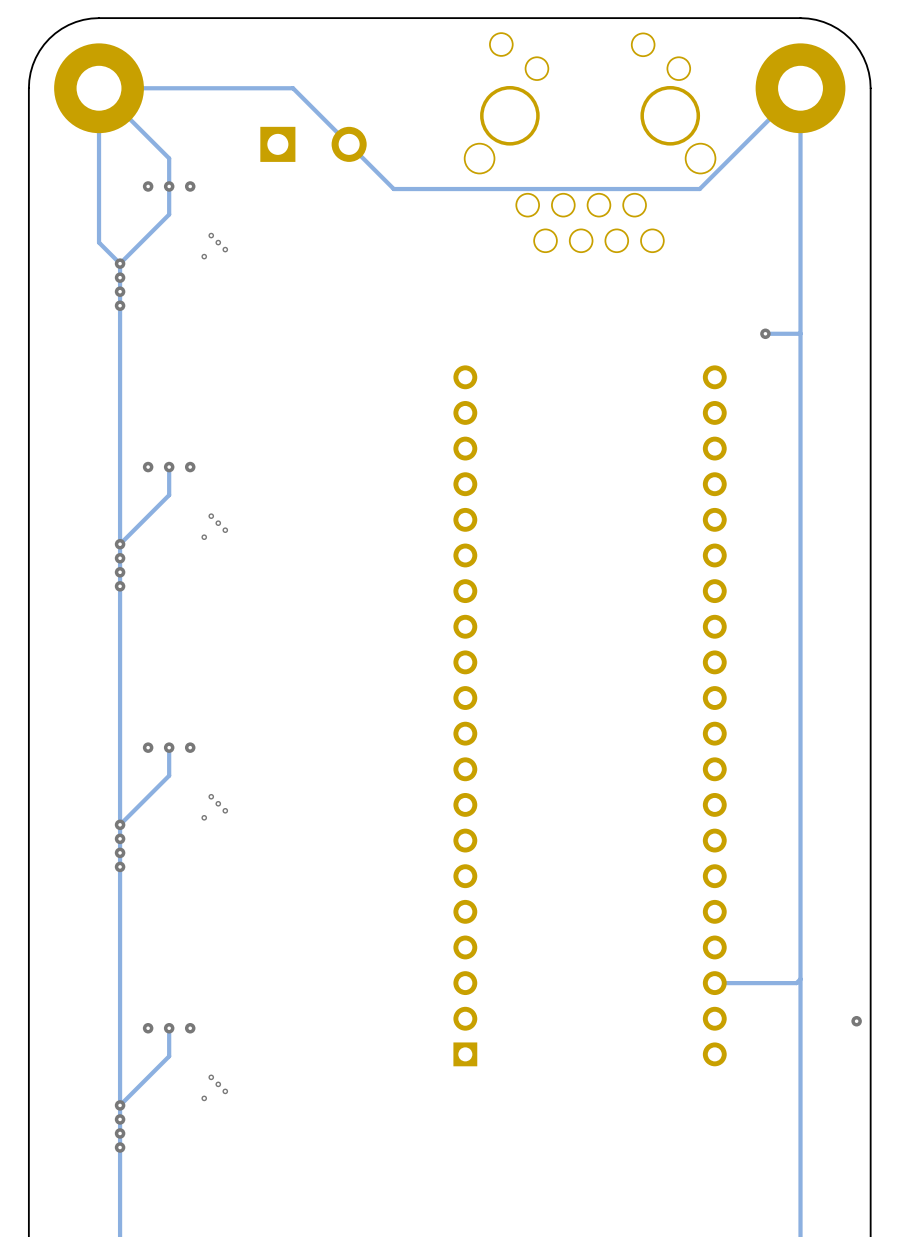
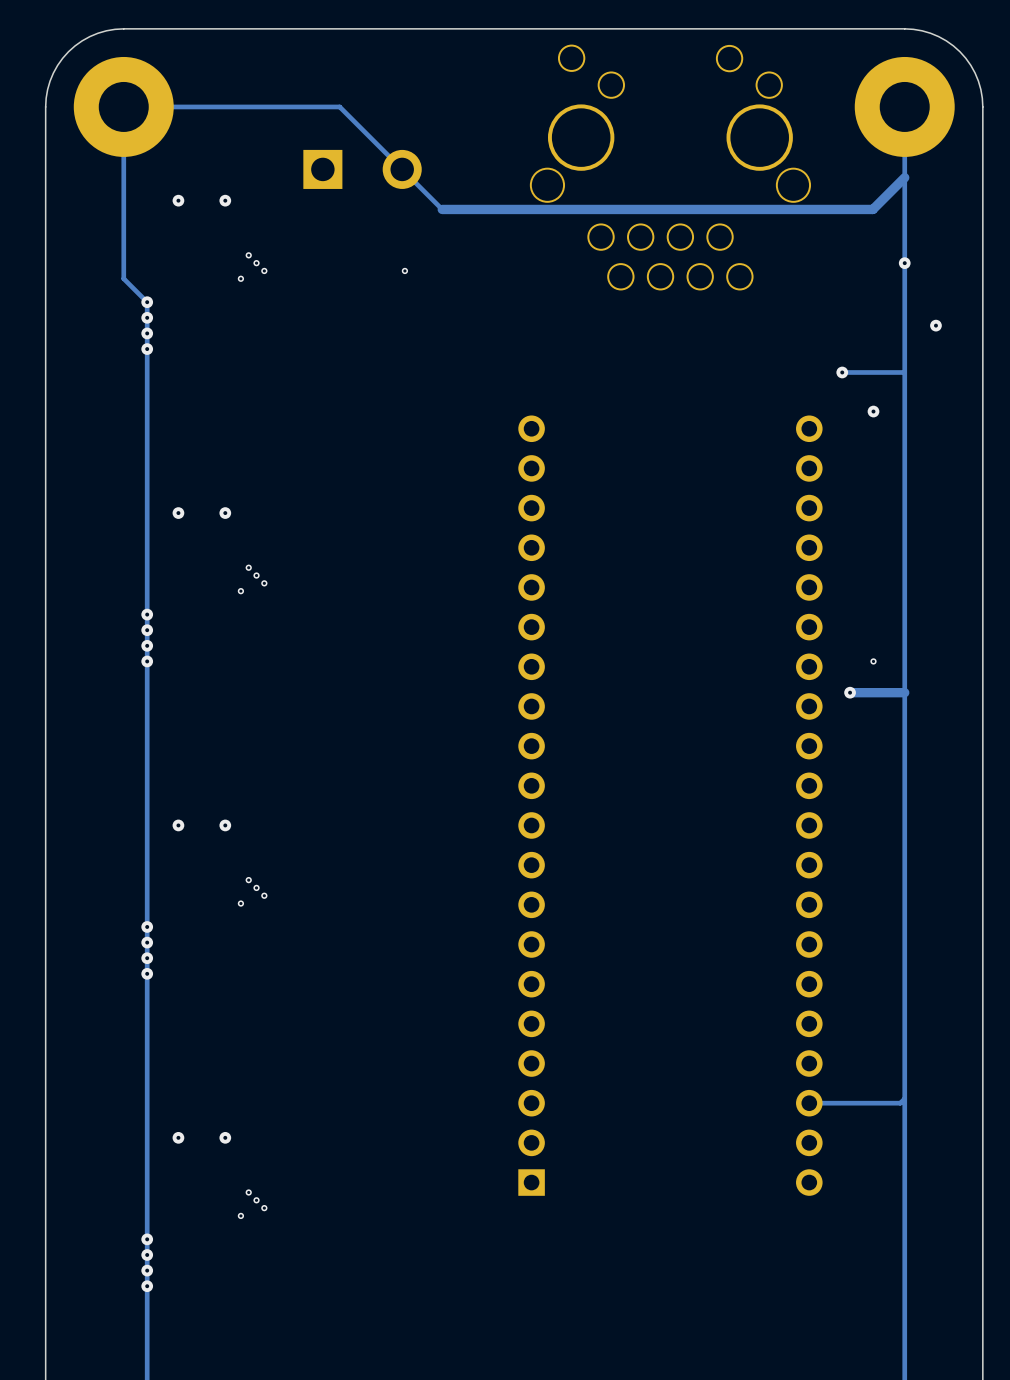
track: (99, 88) (169, 158) (169, 214) (120, 263) -> none
track: (800, 88) (699, 189) (393, 189) (385, 180) -> (904, 177) (872, 209) (442, 209)
via: none -> (178, 200)
via: none -> (225, 200)
via: (148, 186) -> none
via: (169, 186) -> none
via: (190, 186) -> none
via: none -> (248, 255)
via: none -> (256, 263)
via: none -> (904, 263)
via: (211, 235) -> none
via: none -> (264, 270)
via: none -> (404, 270)
via: none -> (240, 278)
via: (218, 242) -> none
via: (225, 249) -> none
via: (204, 256) -> none
via: none -> (935, 325)
via: none -> (842, 372)
track: none -> (904, 372) (842, 372)
via: (765, 333) -> none
track: (800, 333) (765, 333) -> none
via: none -> (873, 411)
via: none -> (178, 513)
via: none -> (225, 513)
via: (148, 467) -> none
track: (169, 467) (169, 495) (120, 544) -> none
via: (169, 467) -> none
via: (190, 467) -> none
via: none -> (248, 567)
via: none -> (256, 575)
via: (211, 516) -> none
via: none -> (264, 583)
via: none -> (240, 591)
via: (218, 523) -> none
via: (225, 530) -> none
via: (204, 537) -> none
via: none -> (873, 661)
via: none -> (850, 692)
track: none -> (904, 692) (850, 692)
via: none -> (178, 825)
via: none -> (225, 825)
via: (148, 747) -> none
track: (169, 747) (169, 775) (120, 824) -> none
via: (169, 747) -> none
via: (190, 747) -> none
via: none -> (248, 880)
via: none -> (256, 887)
via: (211, 796) -> none
via: none -> (264, 895)
via: none -> (240, 903)
via: (218, 803) -> none
via: (225, 810) -> none
via: (204, 817) -> none
via: none -> (178, 1137)
via: none -> (225, 1137)
via: (856, 1021) -> none
via: (148, 1028) -> none
track: (169, 1028) (169, 1056) (120, 1105) -> none
via: (169, 1028) -> none
via: (190, 1028) -> none
via: none -> (248, 1192)
via: none -> (256, 1200)
via: (211, 1077) -> none
via: none -> (264, 1208)
via: none -> (240, 1215)
via: (218, 1084) -> none
via: (225, 1091) -> none
via: (204, 1098) -> none

